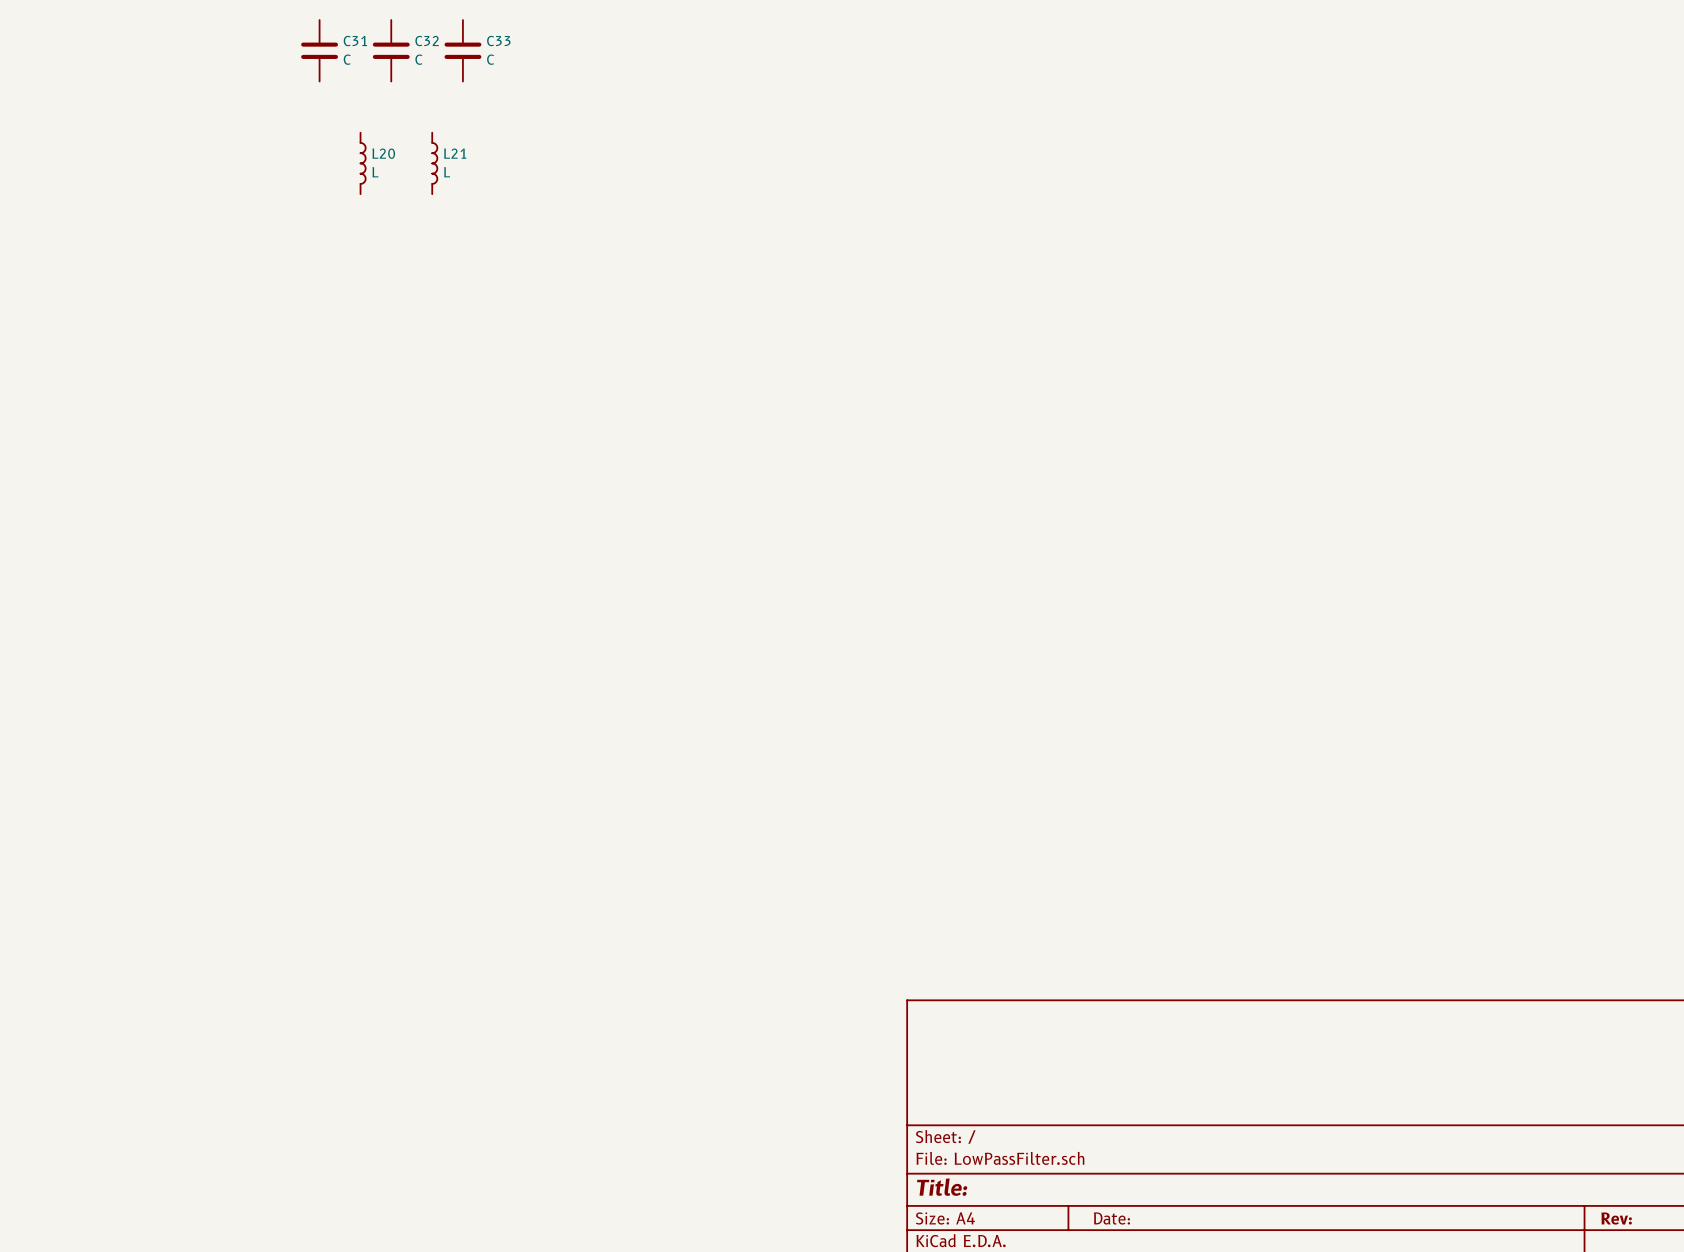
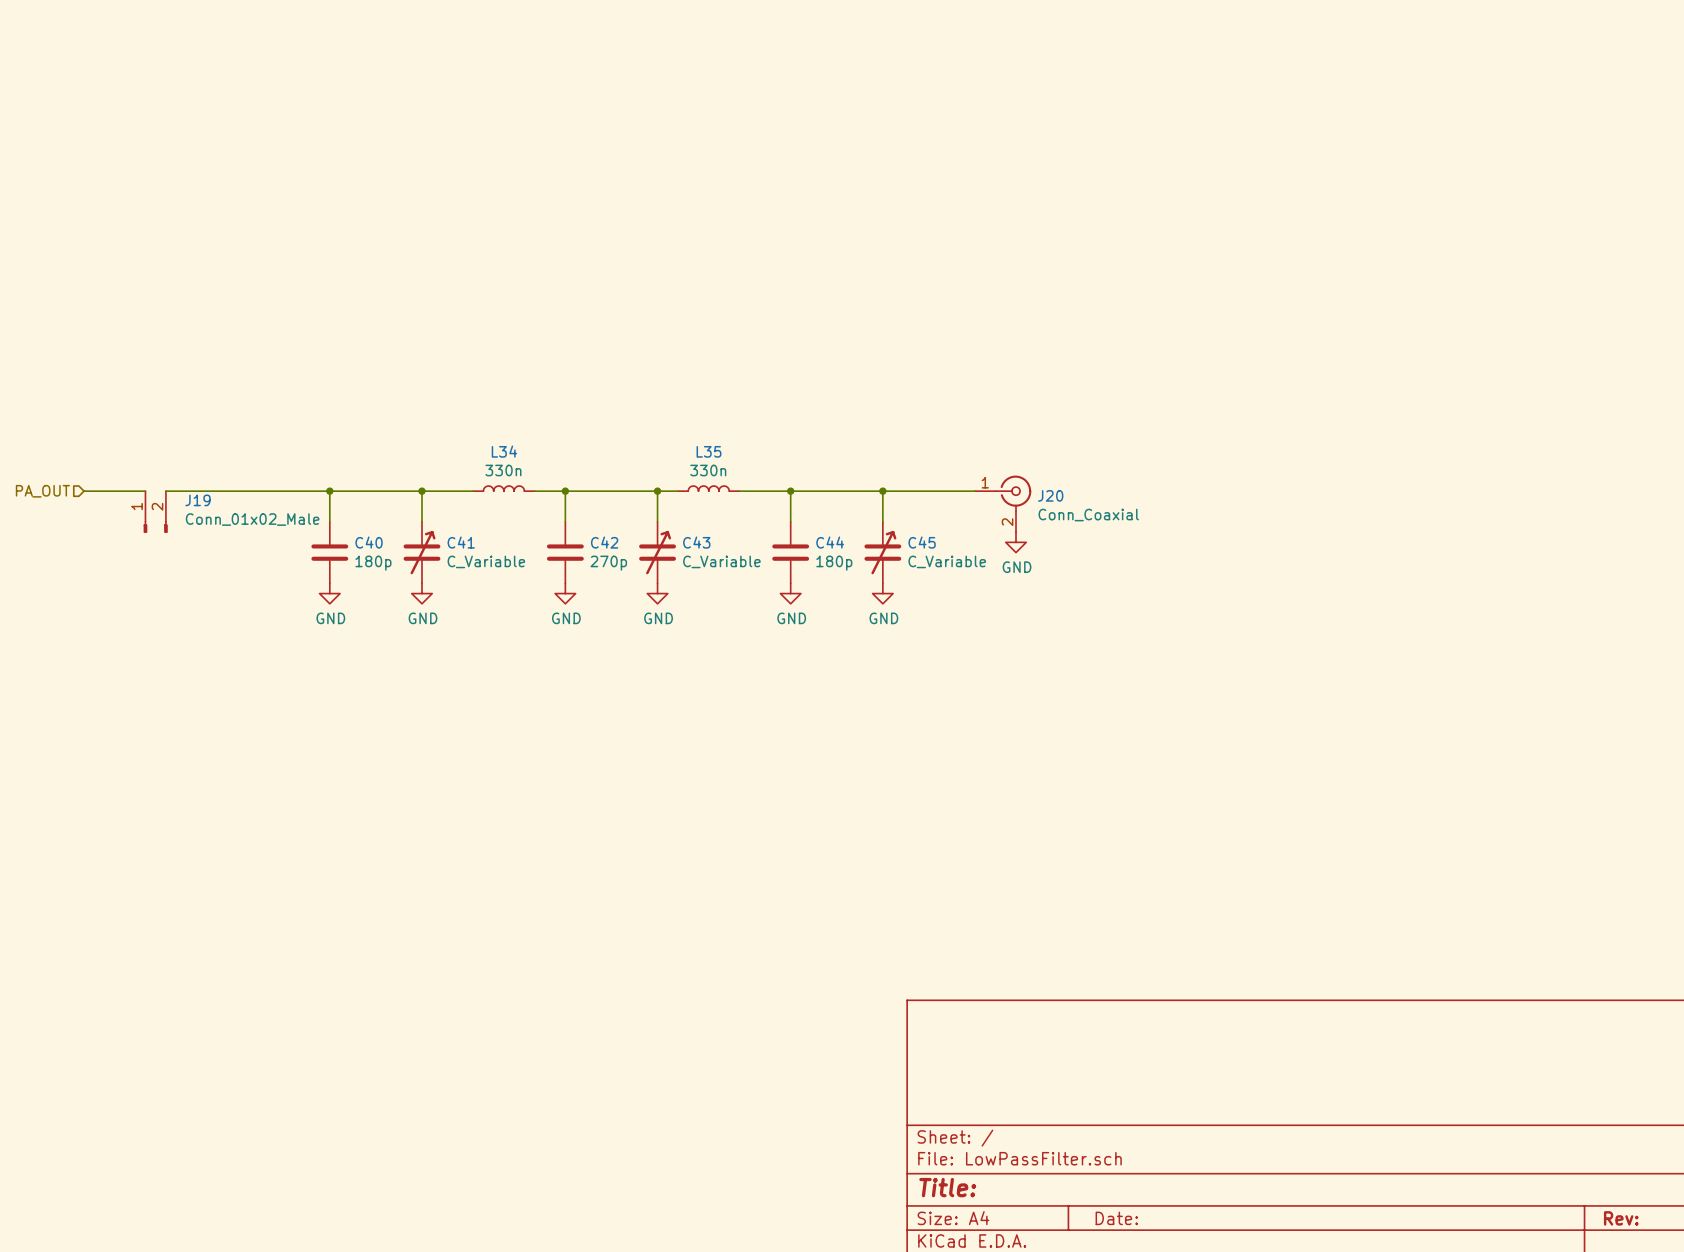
C31: C (319, 50) -> none
C32: C (391, 50) -> none
C33: C (462, 50) -> none
L20: L (363, 163) -> none
L21: L (434, 163) -> none
L34: none -> 330n (503, 488)
L35: none -> 330n (708, 488)
wire: none -> (84, 491) (145, 491)
wire: none -> (165, 491) (473, 491)
wire: none -> (329, 491) (329, 521)
junction: none -> (329, 491)
wire: none -> (421, 491) (421, 521)
junction: none -> (421, 491)
wire: none -> (534, 491) (678, 491)
wire: none -> (565, 491) (565, 521)
junction: none -> (565, 491)
wire: none -> (657, 491) (657, 521)
junction: none -> (657, 491)
wire: none -> (739, 491) (975, 491)
wire: none -> (790, 491) (790, 521)
junction: none -> (790, 491)
wire: none -> (882, 491) (882, 521)
junction: none -> (882, 491)
hierarchical label: none -> PA_OUT (42, 491)
J20: none -> Conn_Coaxial (1003, 503)
J19: none -> Conn_01x02_Male (155, 511)
power symbol: none -> GND (1015, 542)
C40: none -> 180p (329, 552)
C41: none -> C_Variable (421, 552)
C42: none -> 270p (565, 552)
C43: none -> C_Variable (657, 552)
C44: none -> 180p (790, 552)
C45: none -> C_Variable (882, 552)
power symbol: none -> GND (329, 593)
power symbol: none -> GND (421, 593)
power symbol: none -> GND (565, 593)
power symbol: none -> GND (657, 593)
power symbol: none -> GND (790, 593)
power symbol: none -> GND (882, 593)

